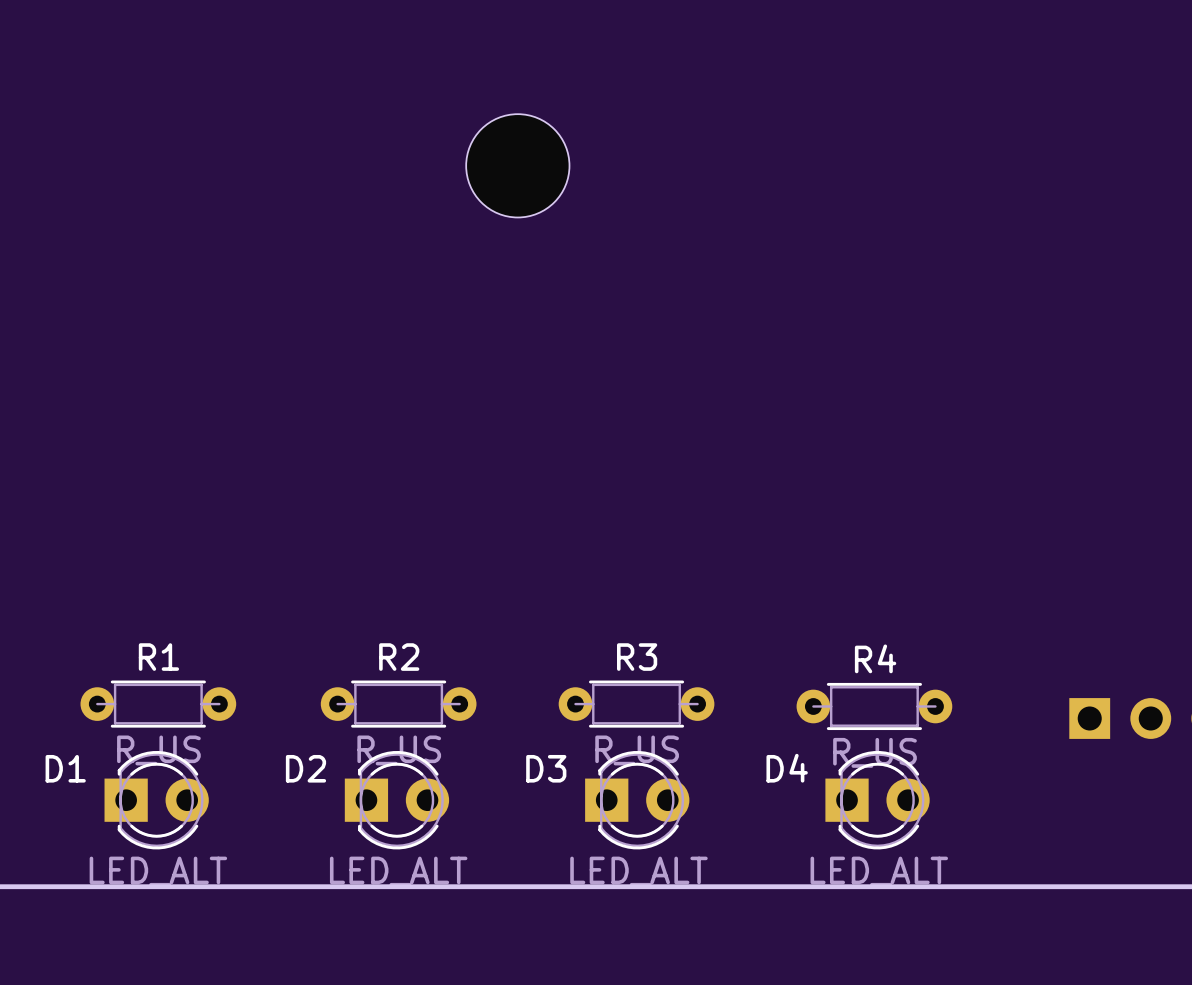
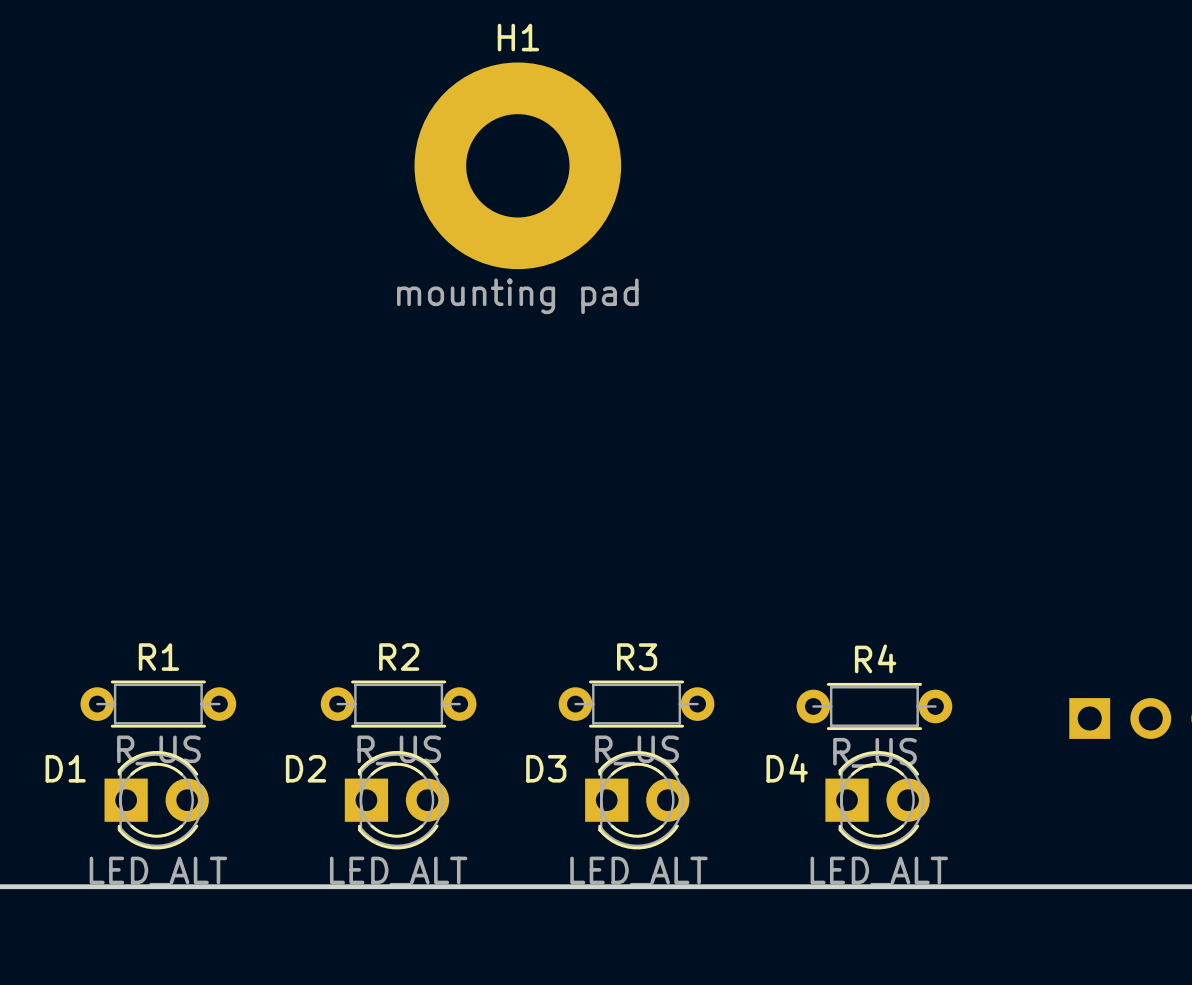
part: (517, 165) -> none
H1: none -> mounting pad (517, 165)

